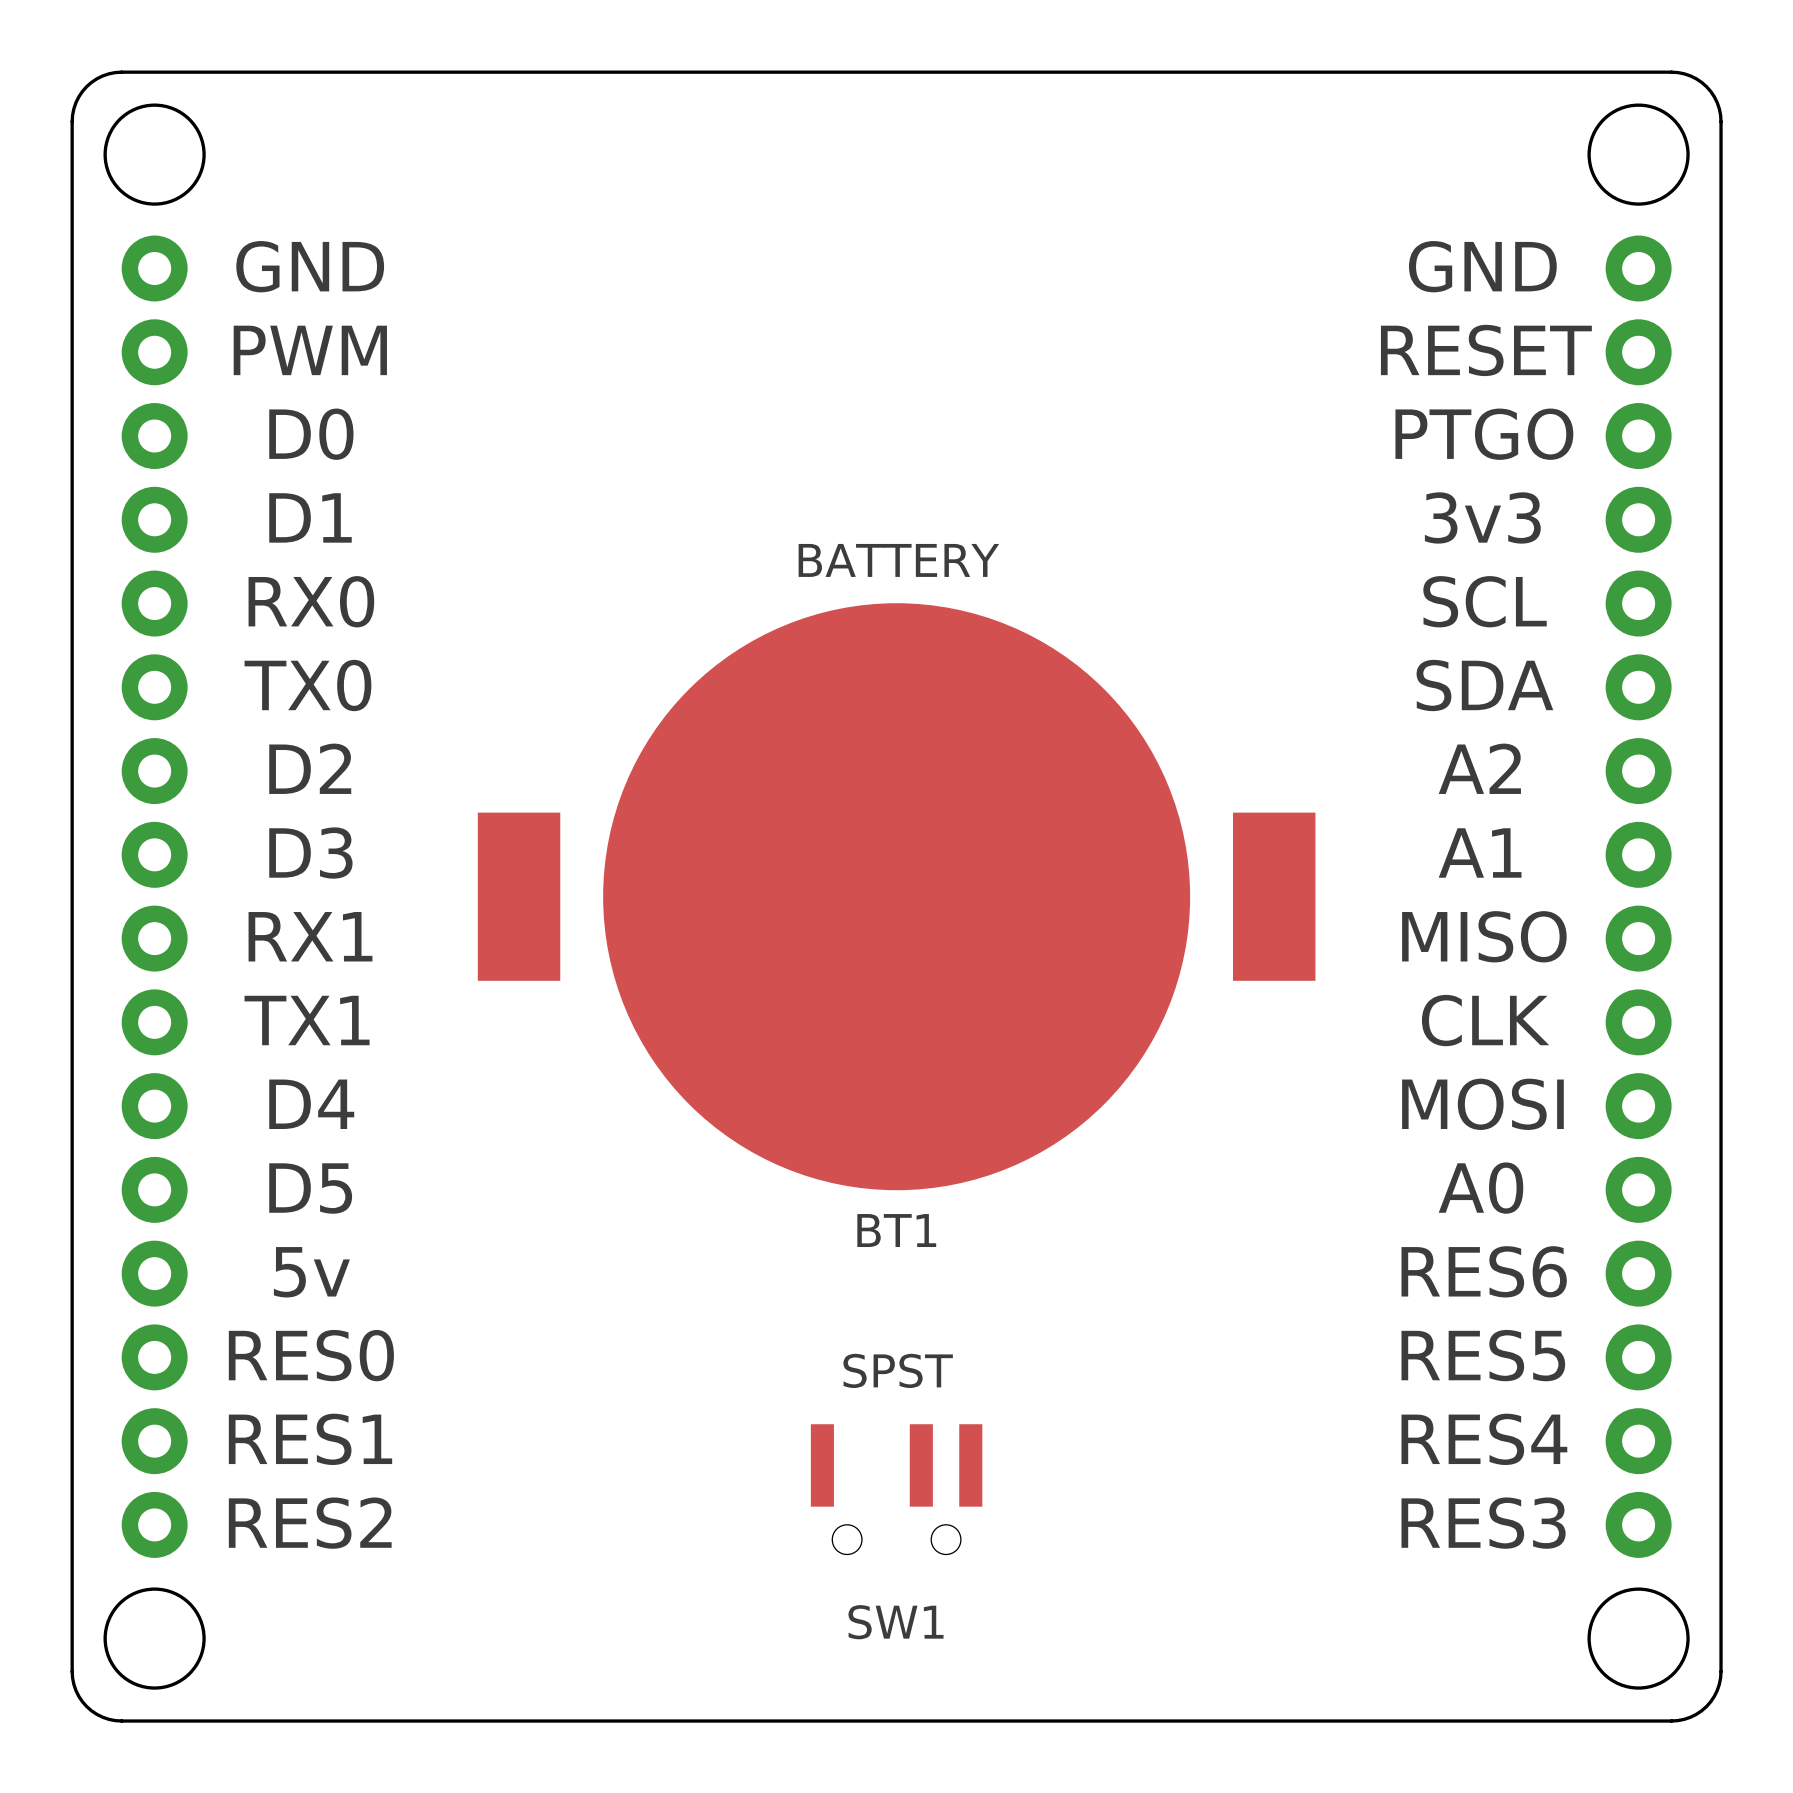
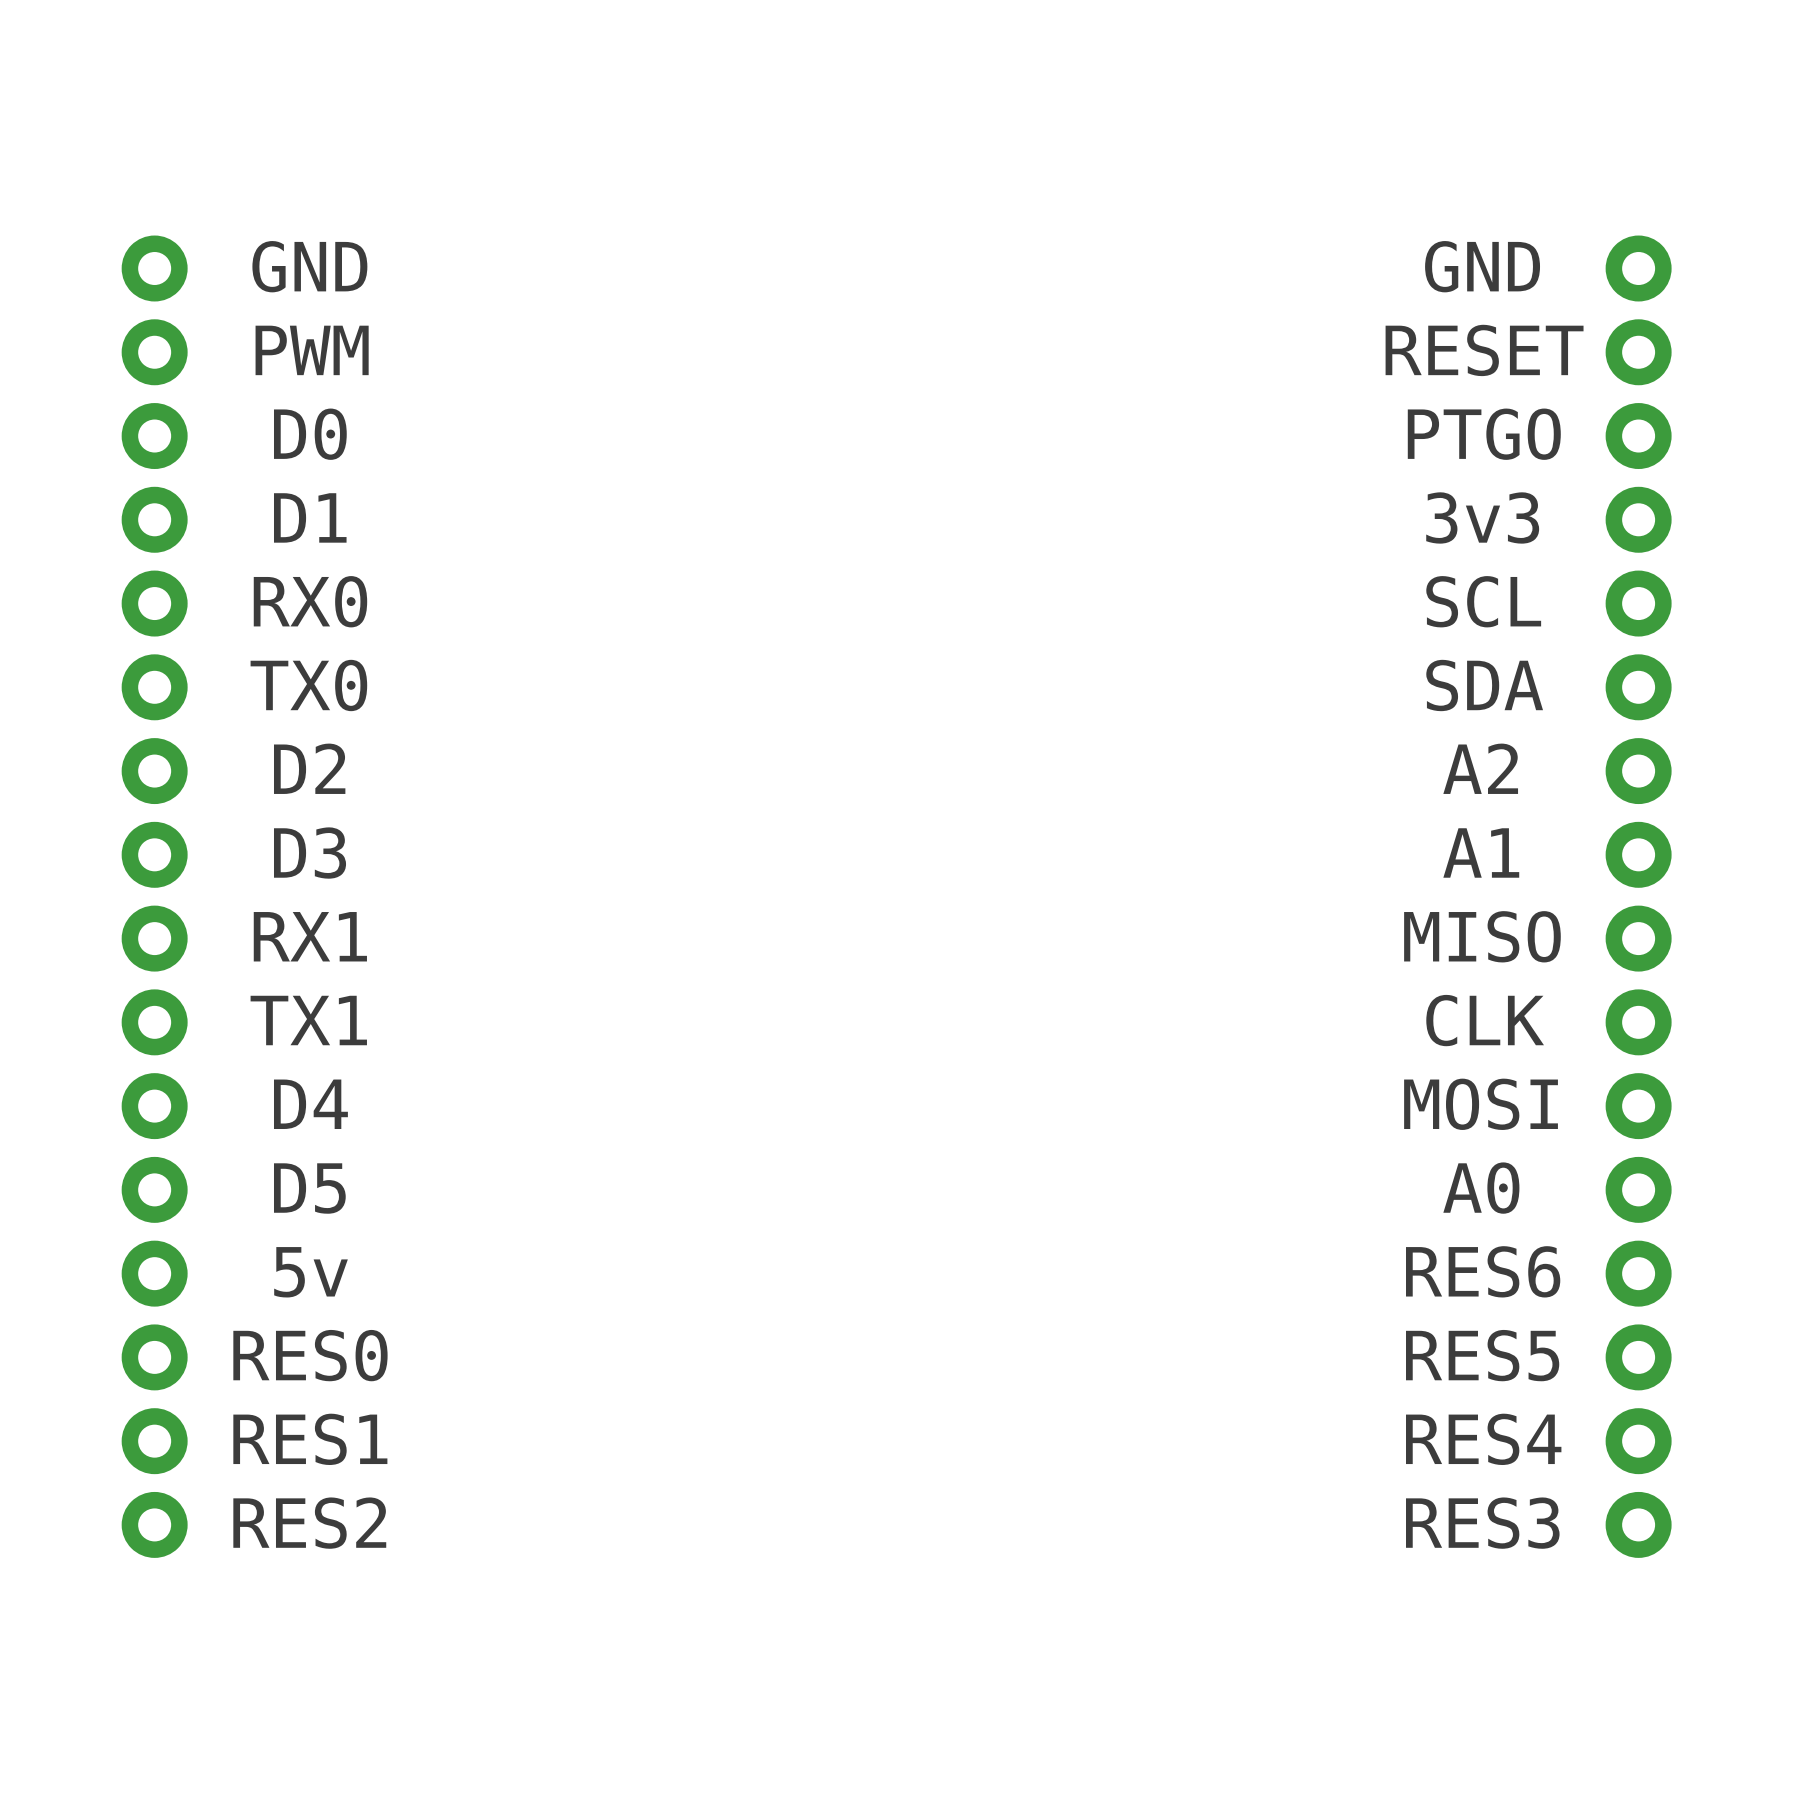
board edge: (121, 72) (1671, 72) (1690, 75) (1706, 86) (1717, 102) (1721, 121) (1721, 1671) (1717, 1690) (1706, 1706) (1690, 1717) (1671, 1721) (121, 1721) (102, 1717) (86, 1706) (75, 1690) (72, 1671) (72, 121) (75, 102) (86, 86) (102, 75) (121, 72) -> none
round board edge: [103, 103, 206, 206] -> none
round board edge: [1587, 103, 1690, 206] -> none
BT1: BATTERY (896, 896) -> none
SW1: SPST (896, 1489) -> none
round board edge: [103, 1587, 206, 1690] -> none
round board edge: [1587, 1587, 1690, 1690] -> none

